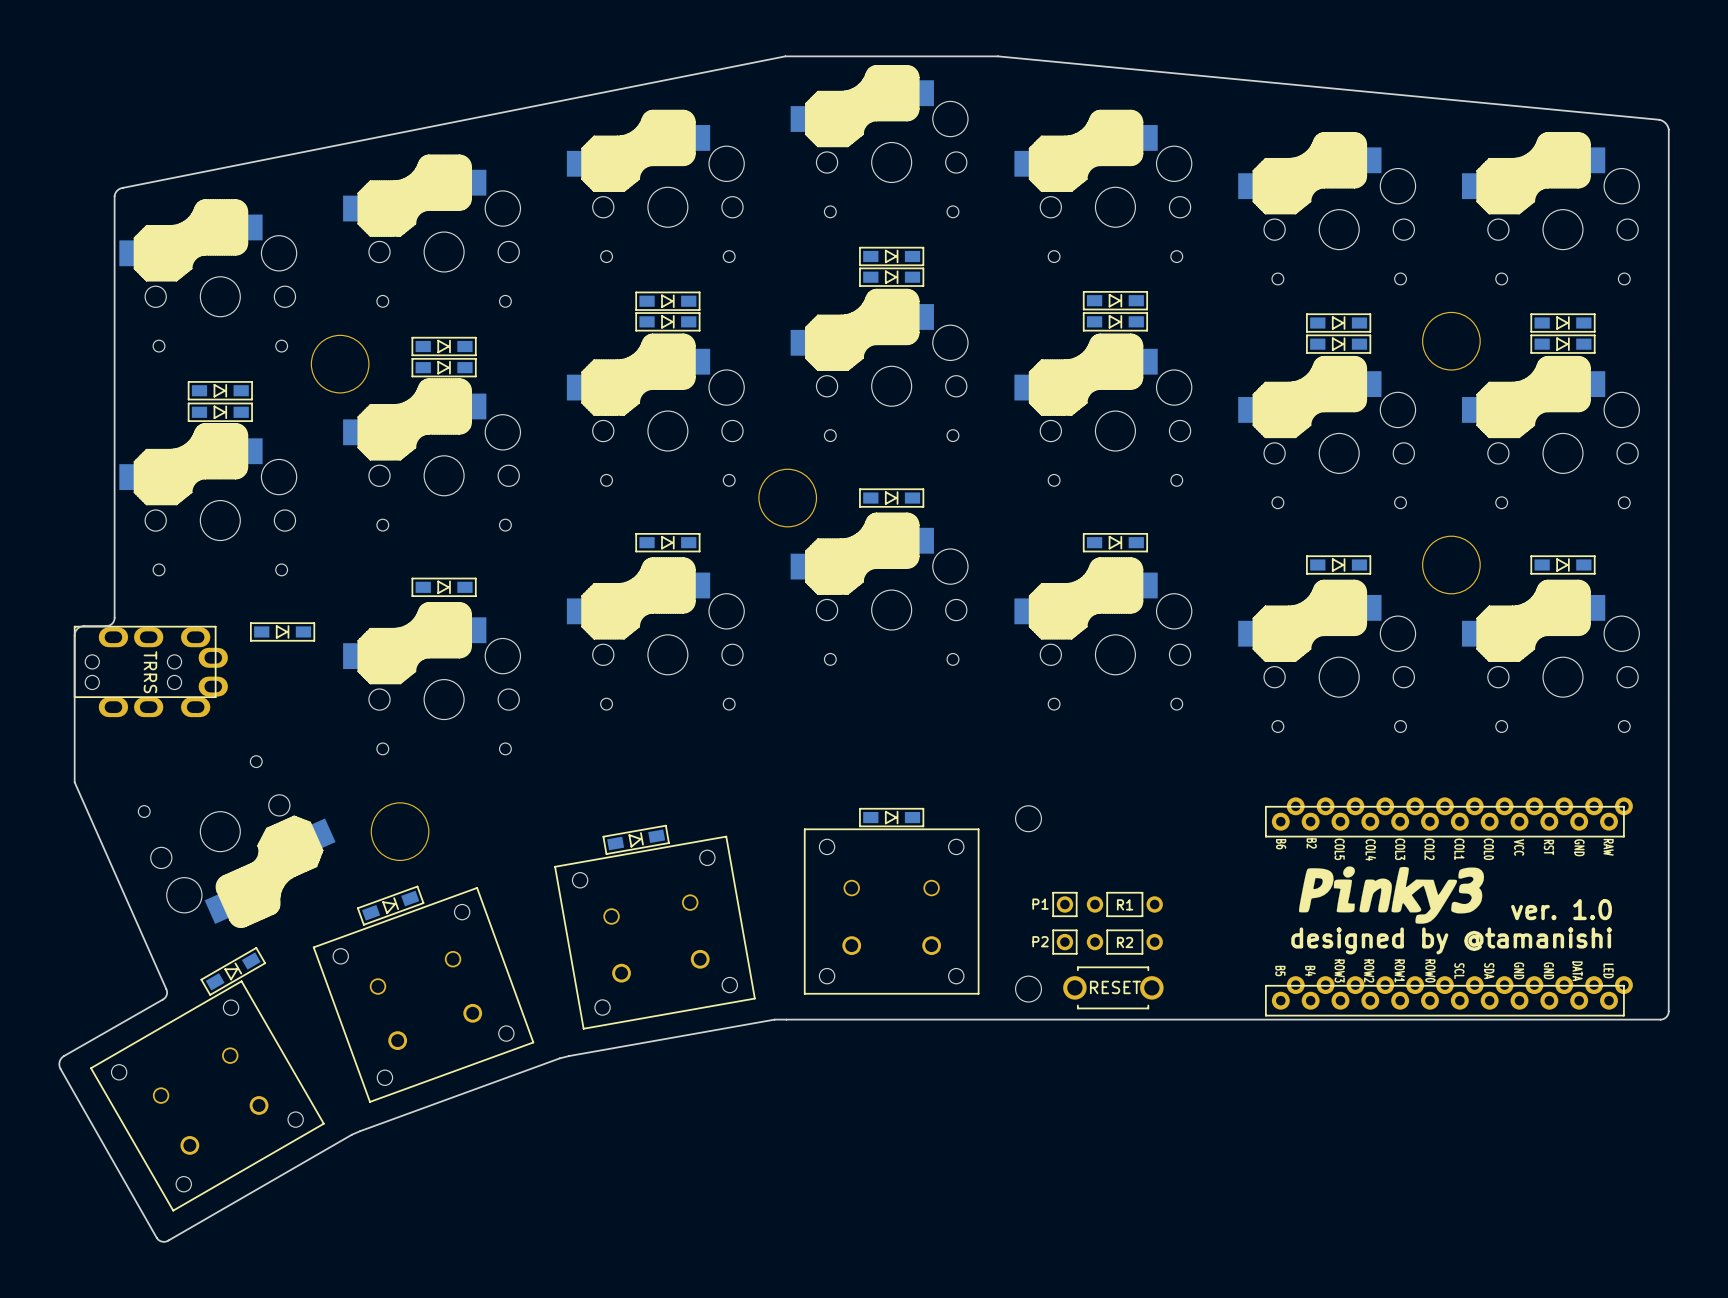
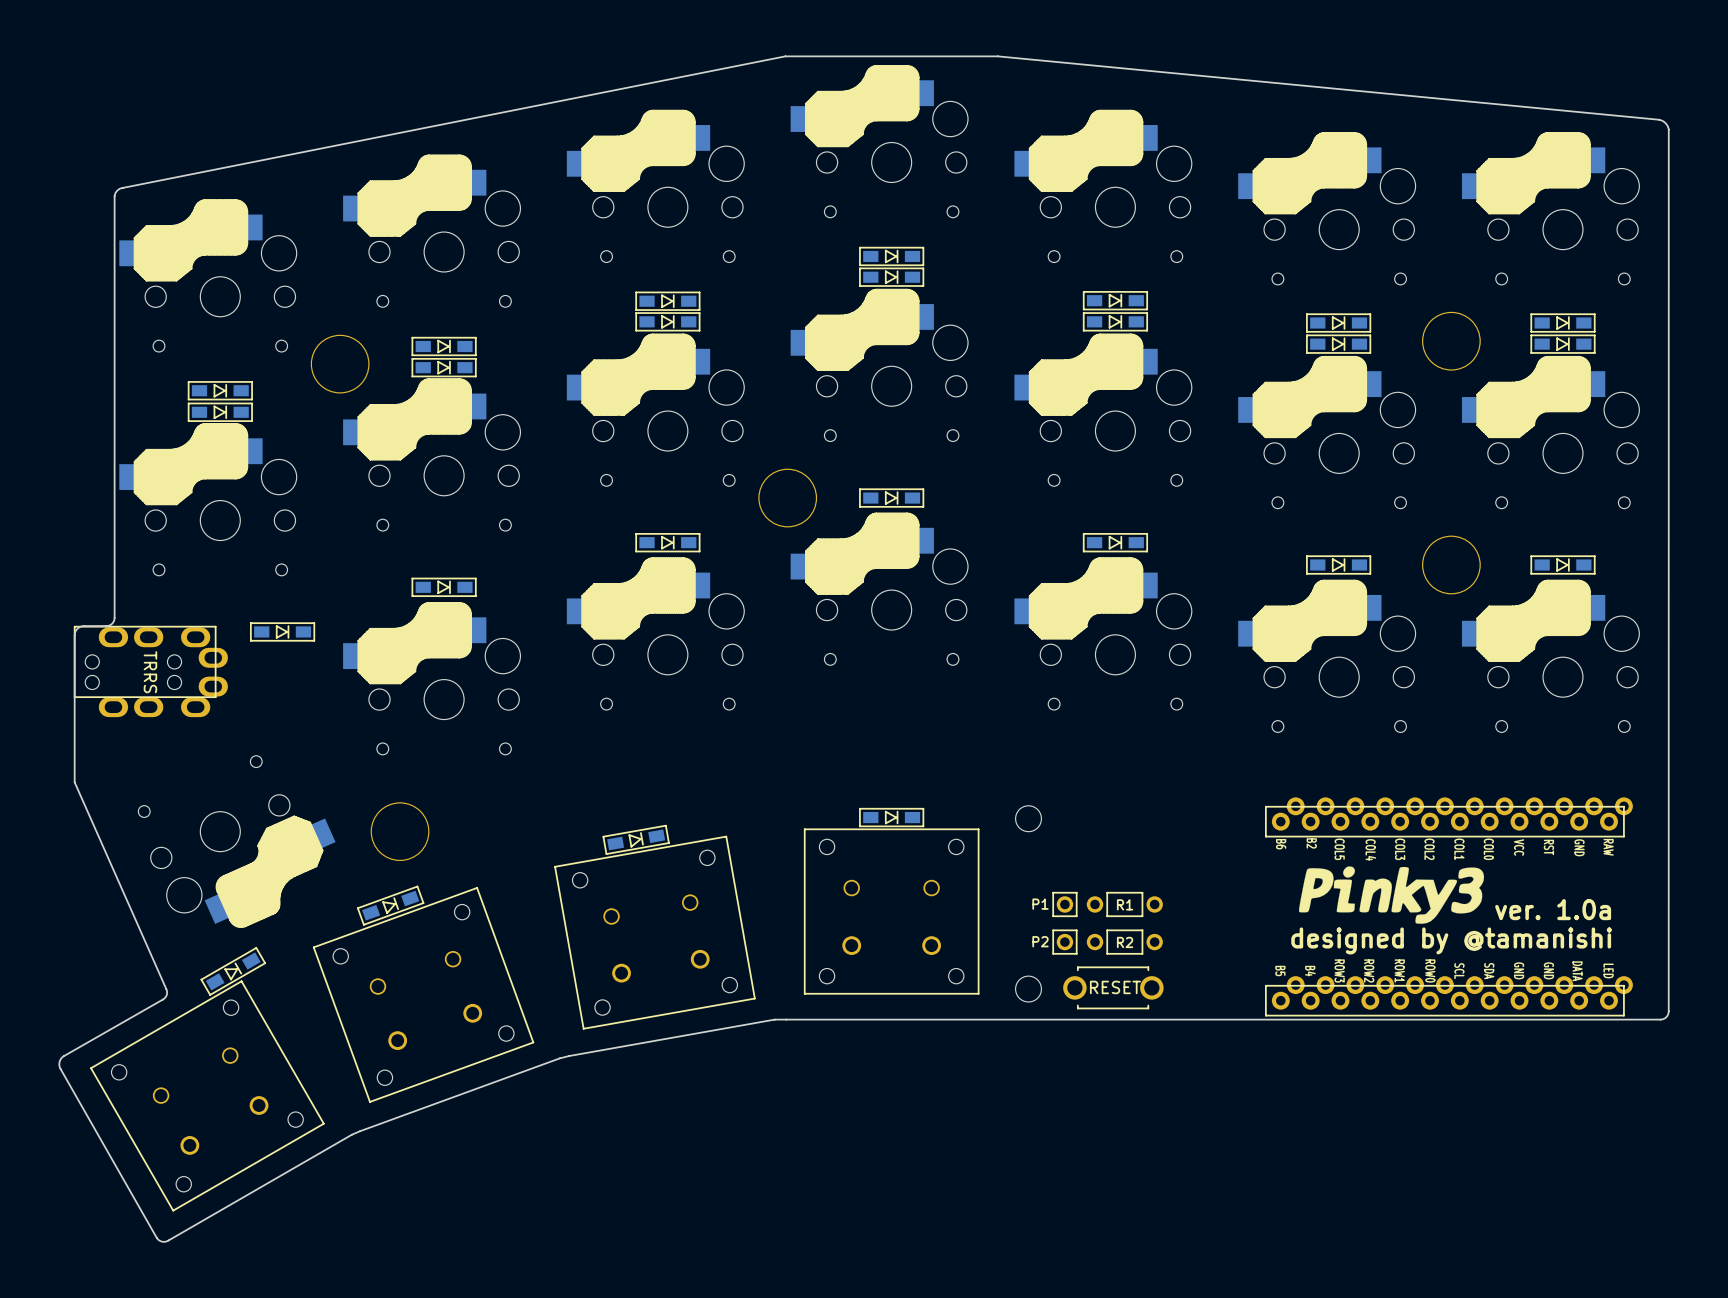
text: ver. 1.0 (1561, 909) -> ver. 1.0a (1553, 909)

